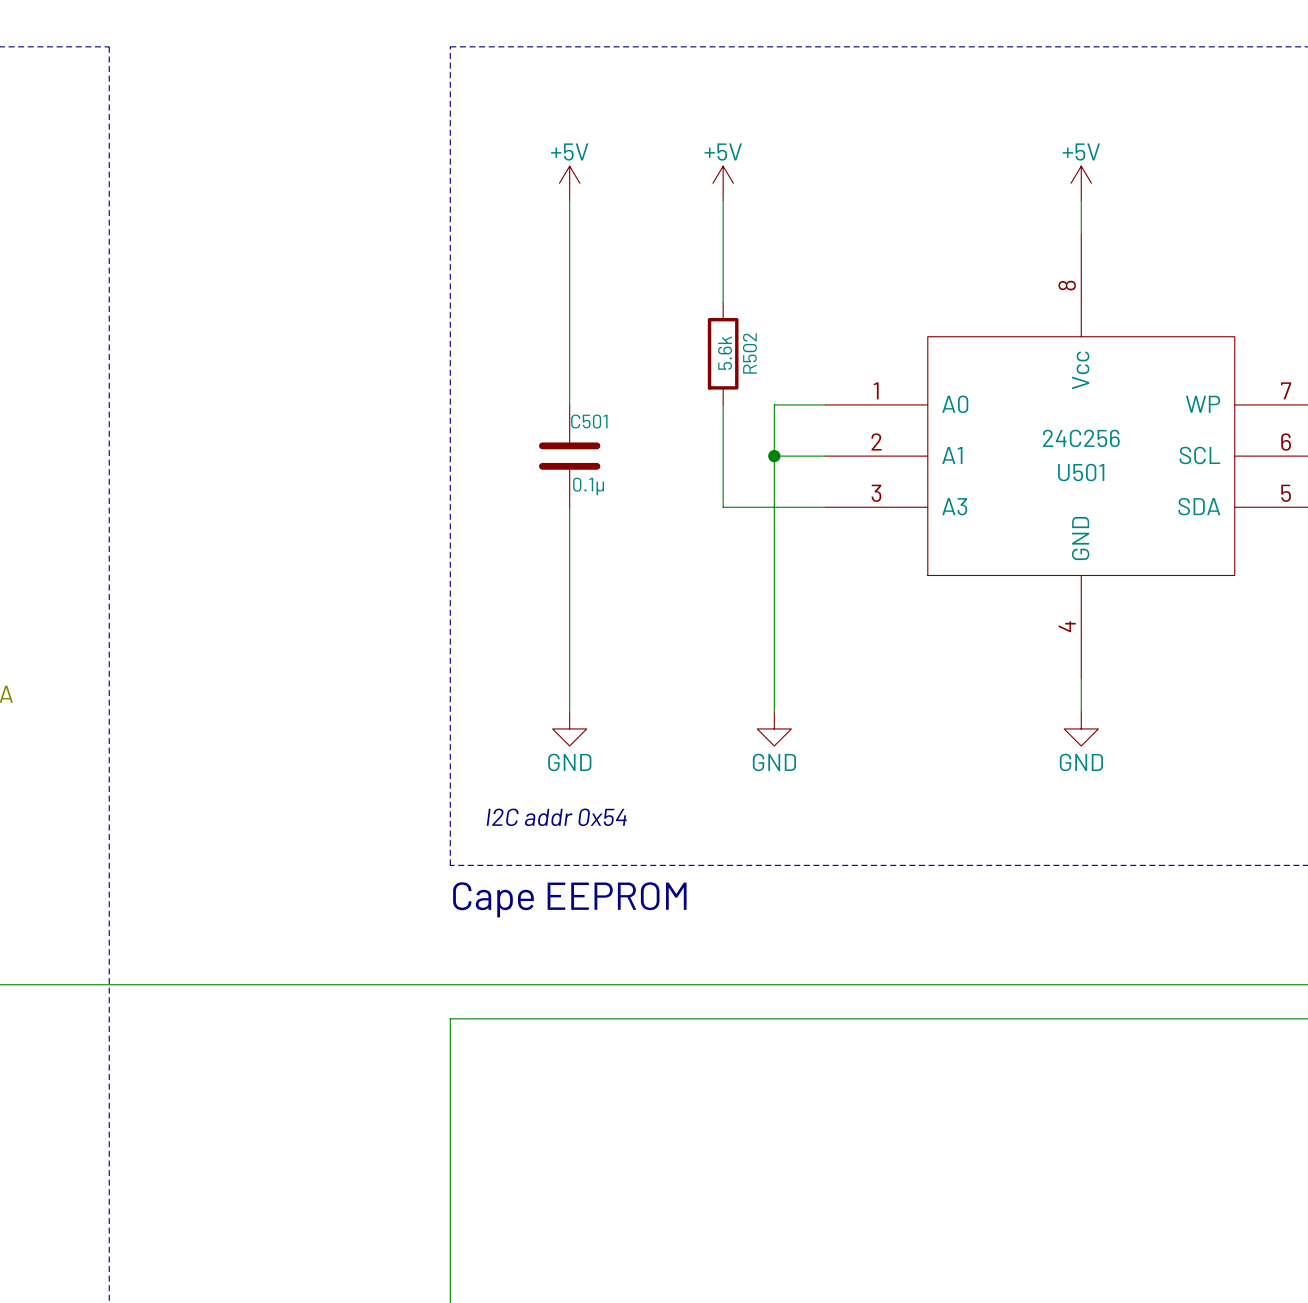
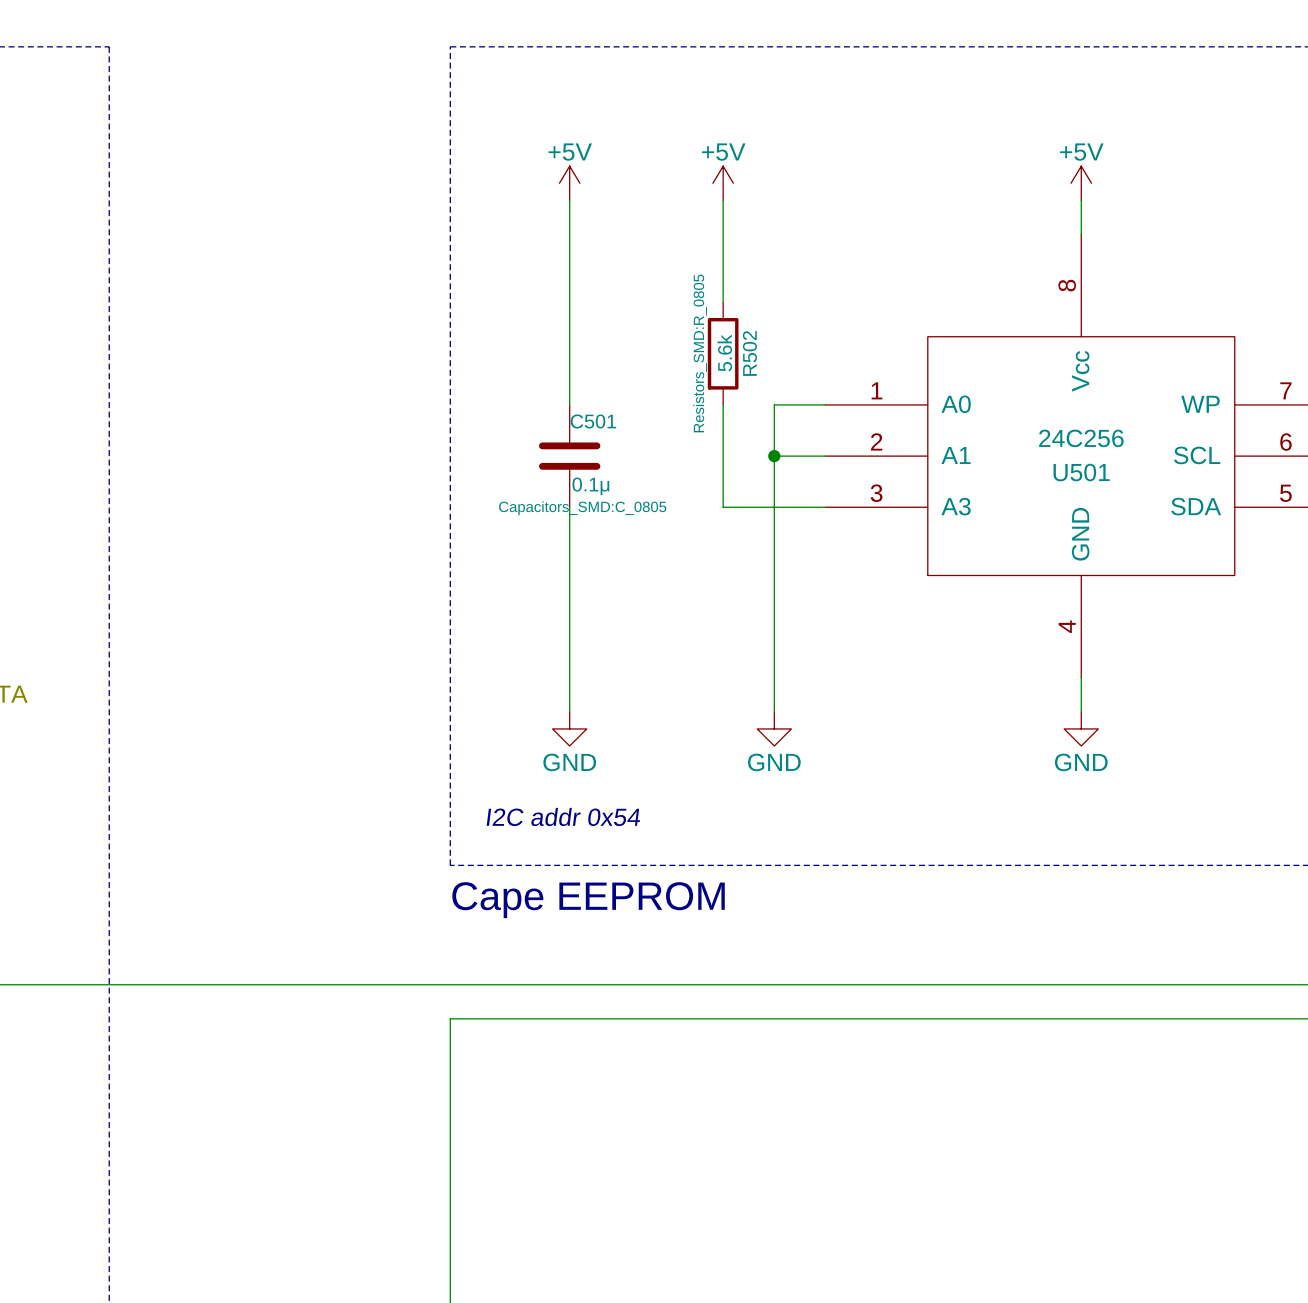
R502 text: none -> Resistors_SMD:R_0805 (700, 353)
C501 text: none -> Capacitors_SMD:C_0805 (582, 508)

